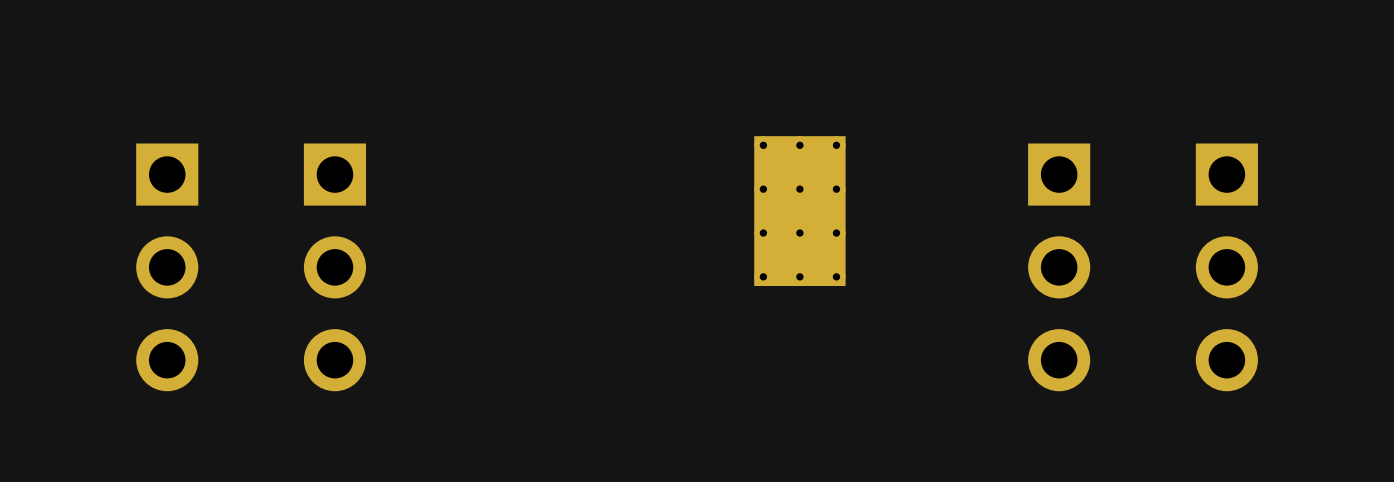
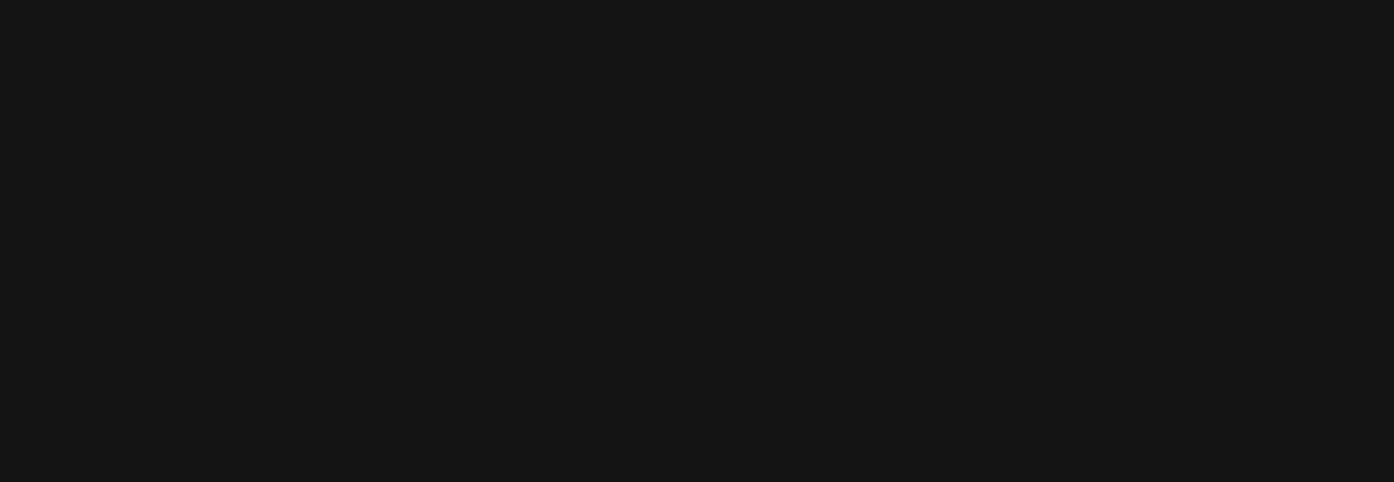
part: (799, 211) -> none
part: (167, 267) -> none
part: (334, 267) -> none
part: (1059, 267) -> none
part: (1226, 267) -> none

